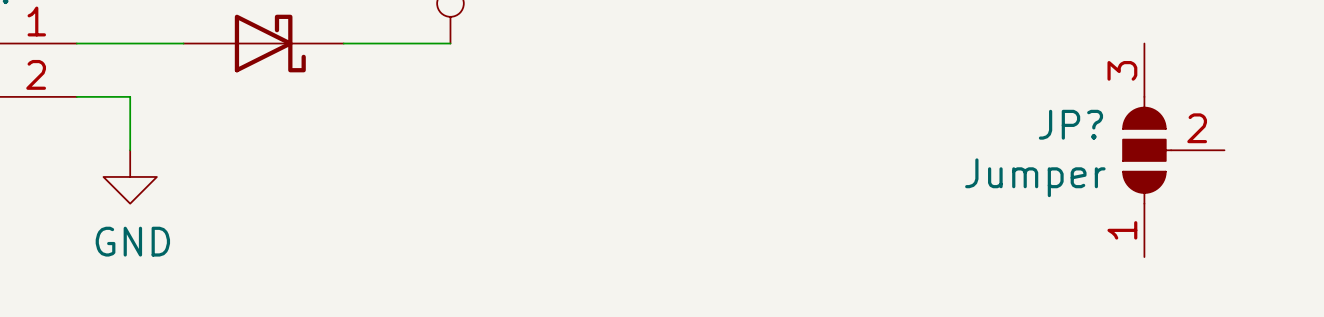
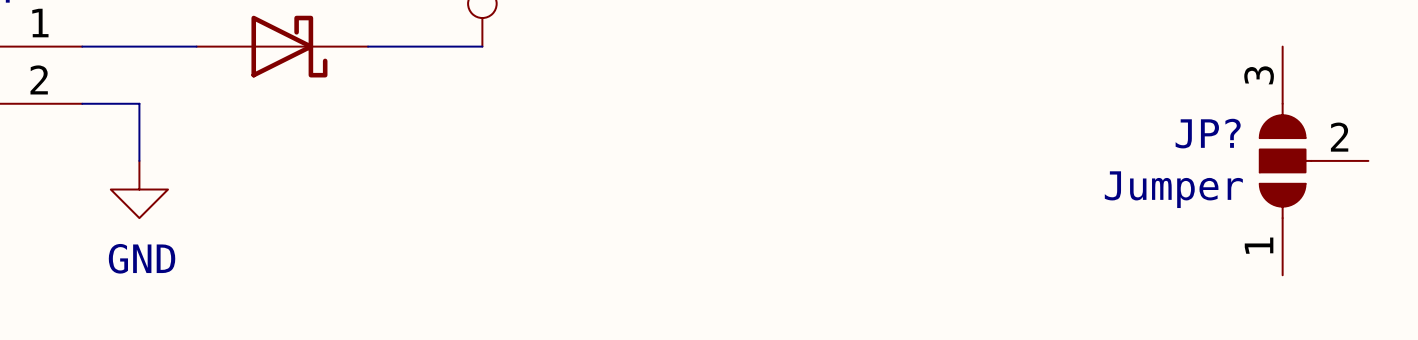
JP? position: (1173, 150) -> (1314, 160)

